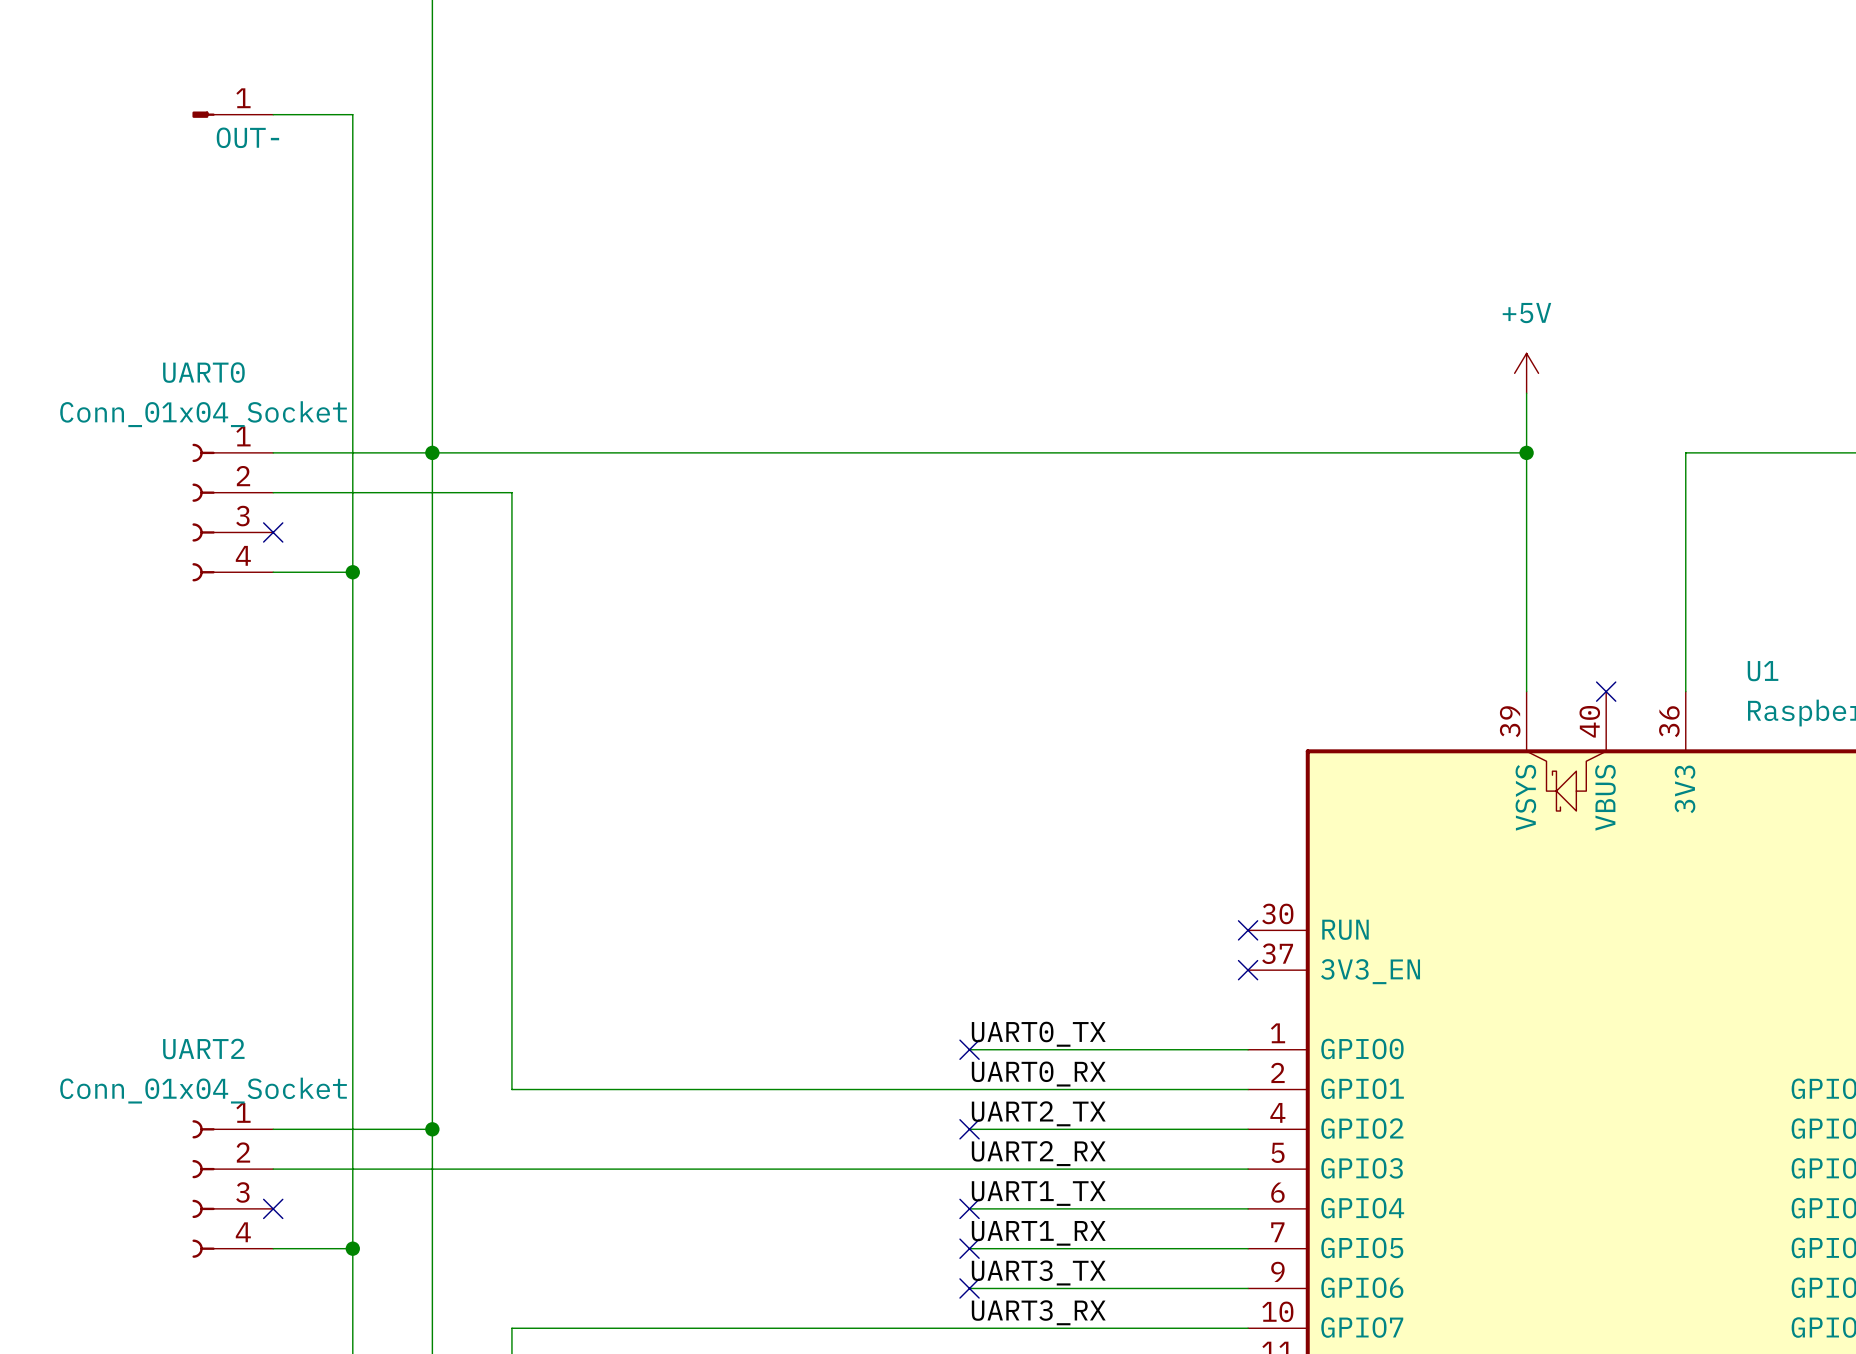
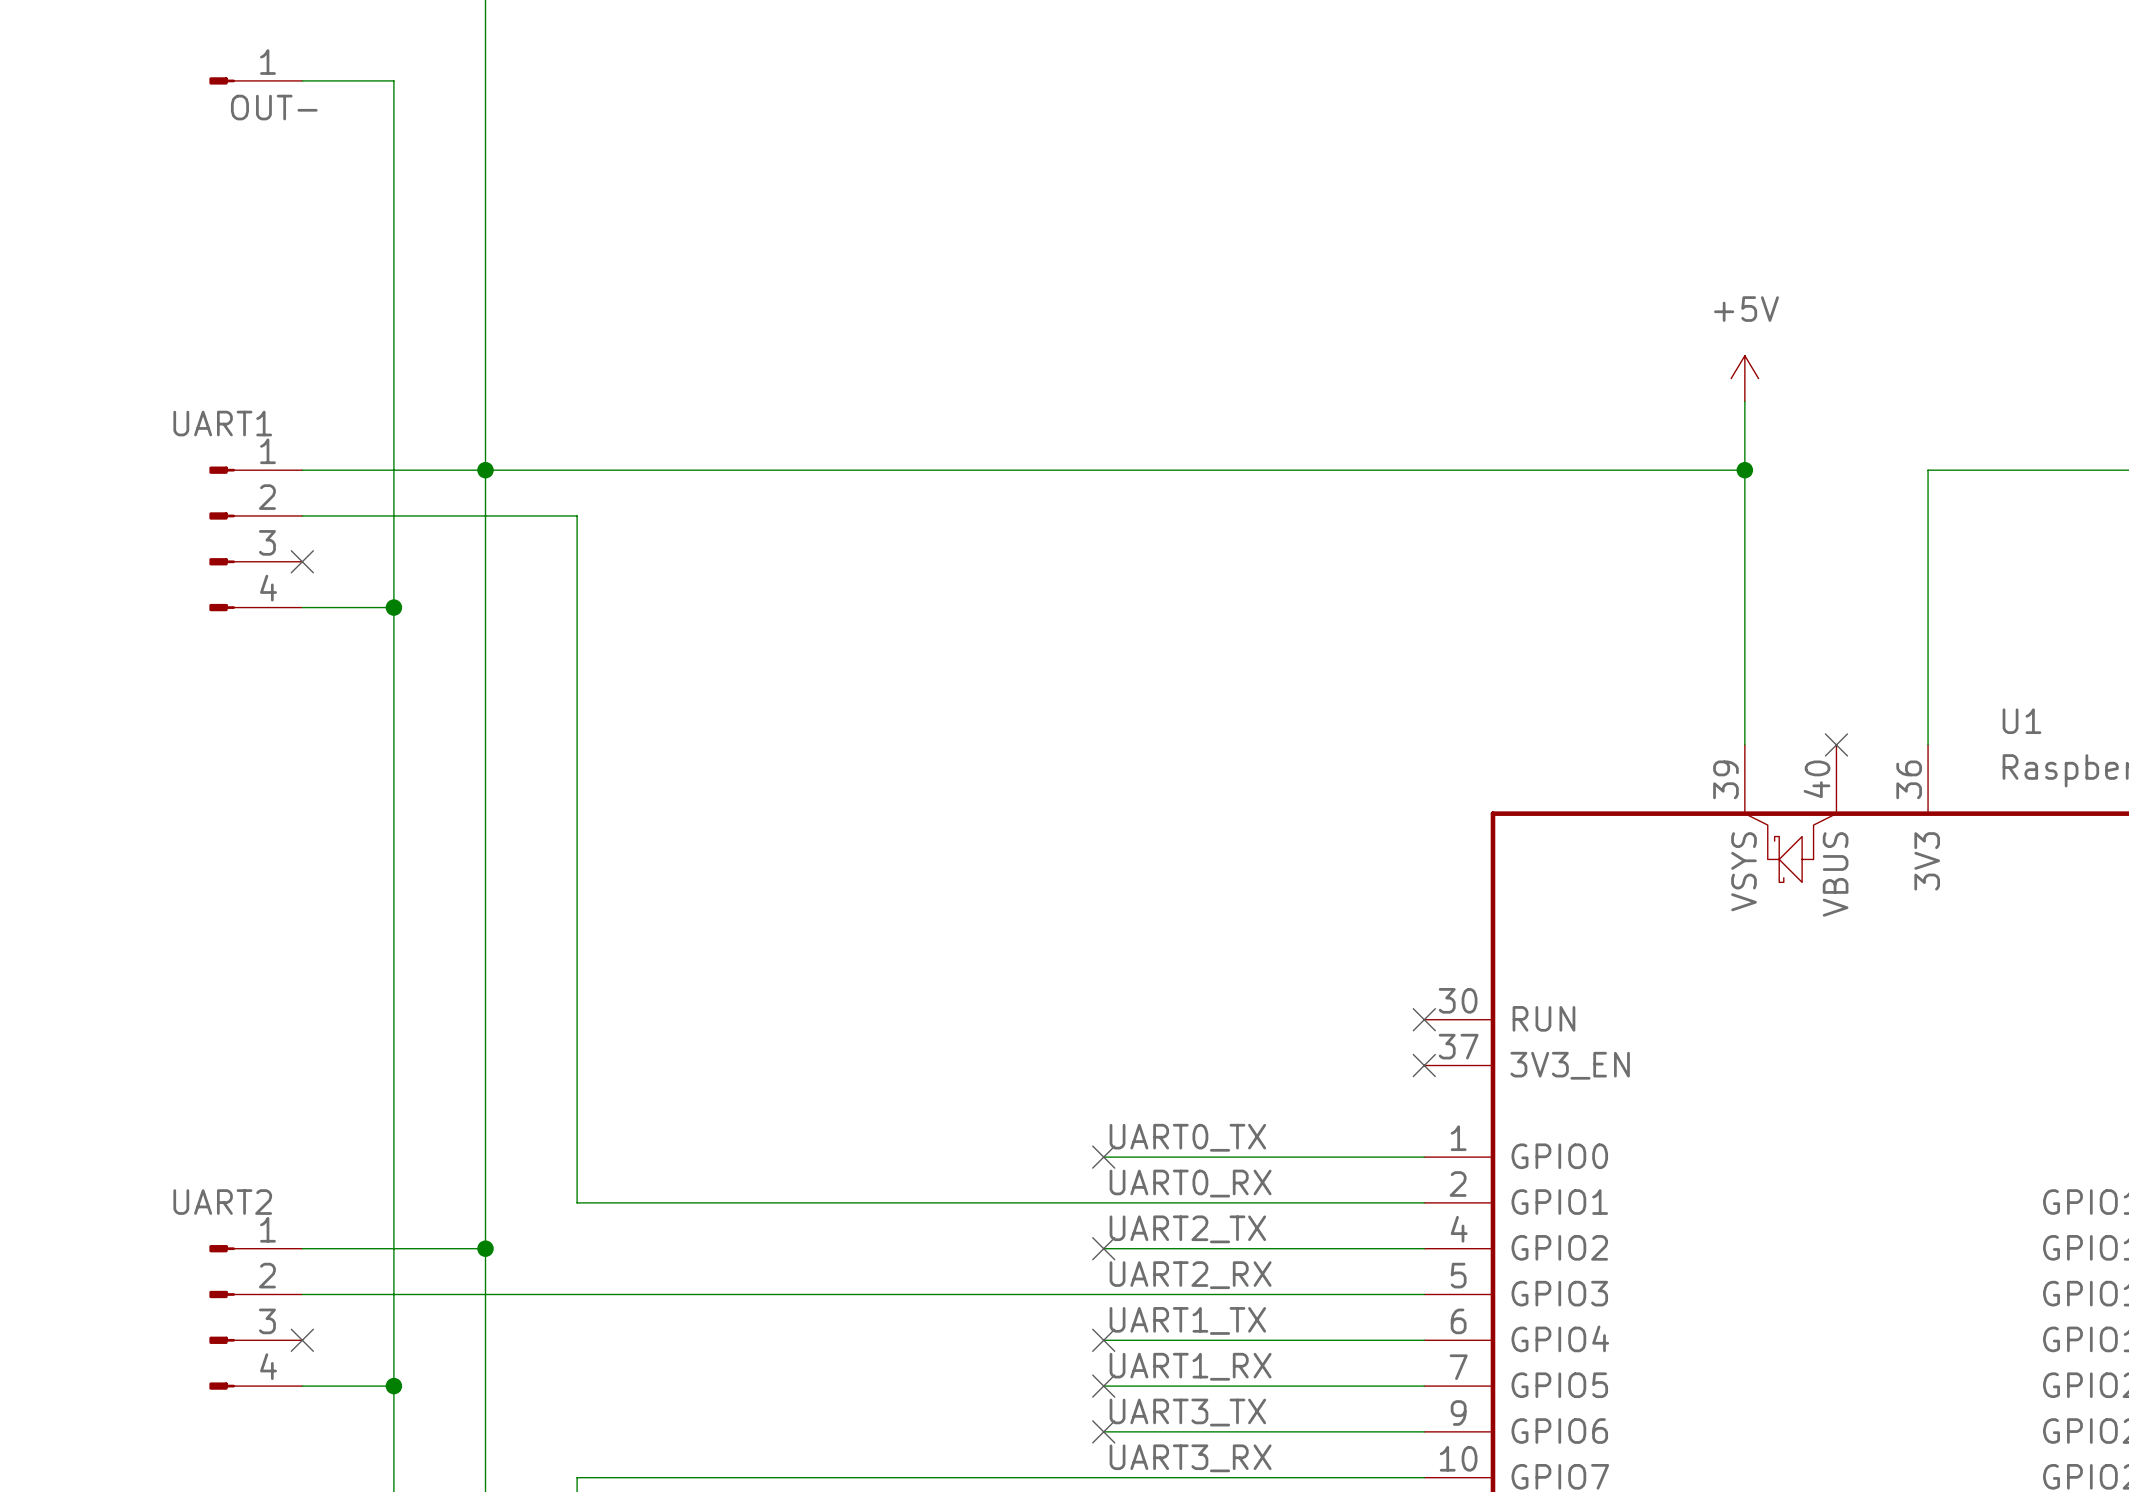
UART0: Conn_01x04_Socket (232, 512) -> none
UART1: none -> (255, 538)
UART2 name position: UART2 (203, 1048) -> UART2 (222, 1202)
UART2 value: Conn_01x04_Socket (203, 1090) -> none
UART2 symbol: [192, 1120, 274, 1258] -> [209, 1245, 303, 1390]

